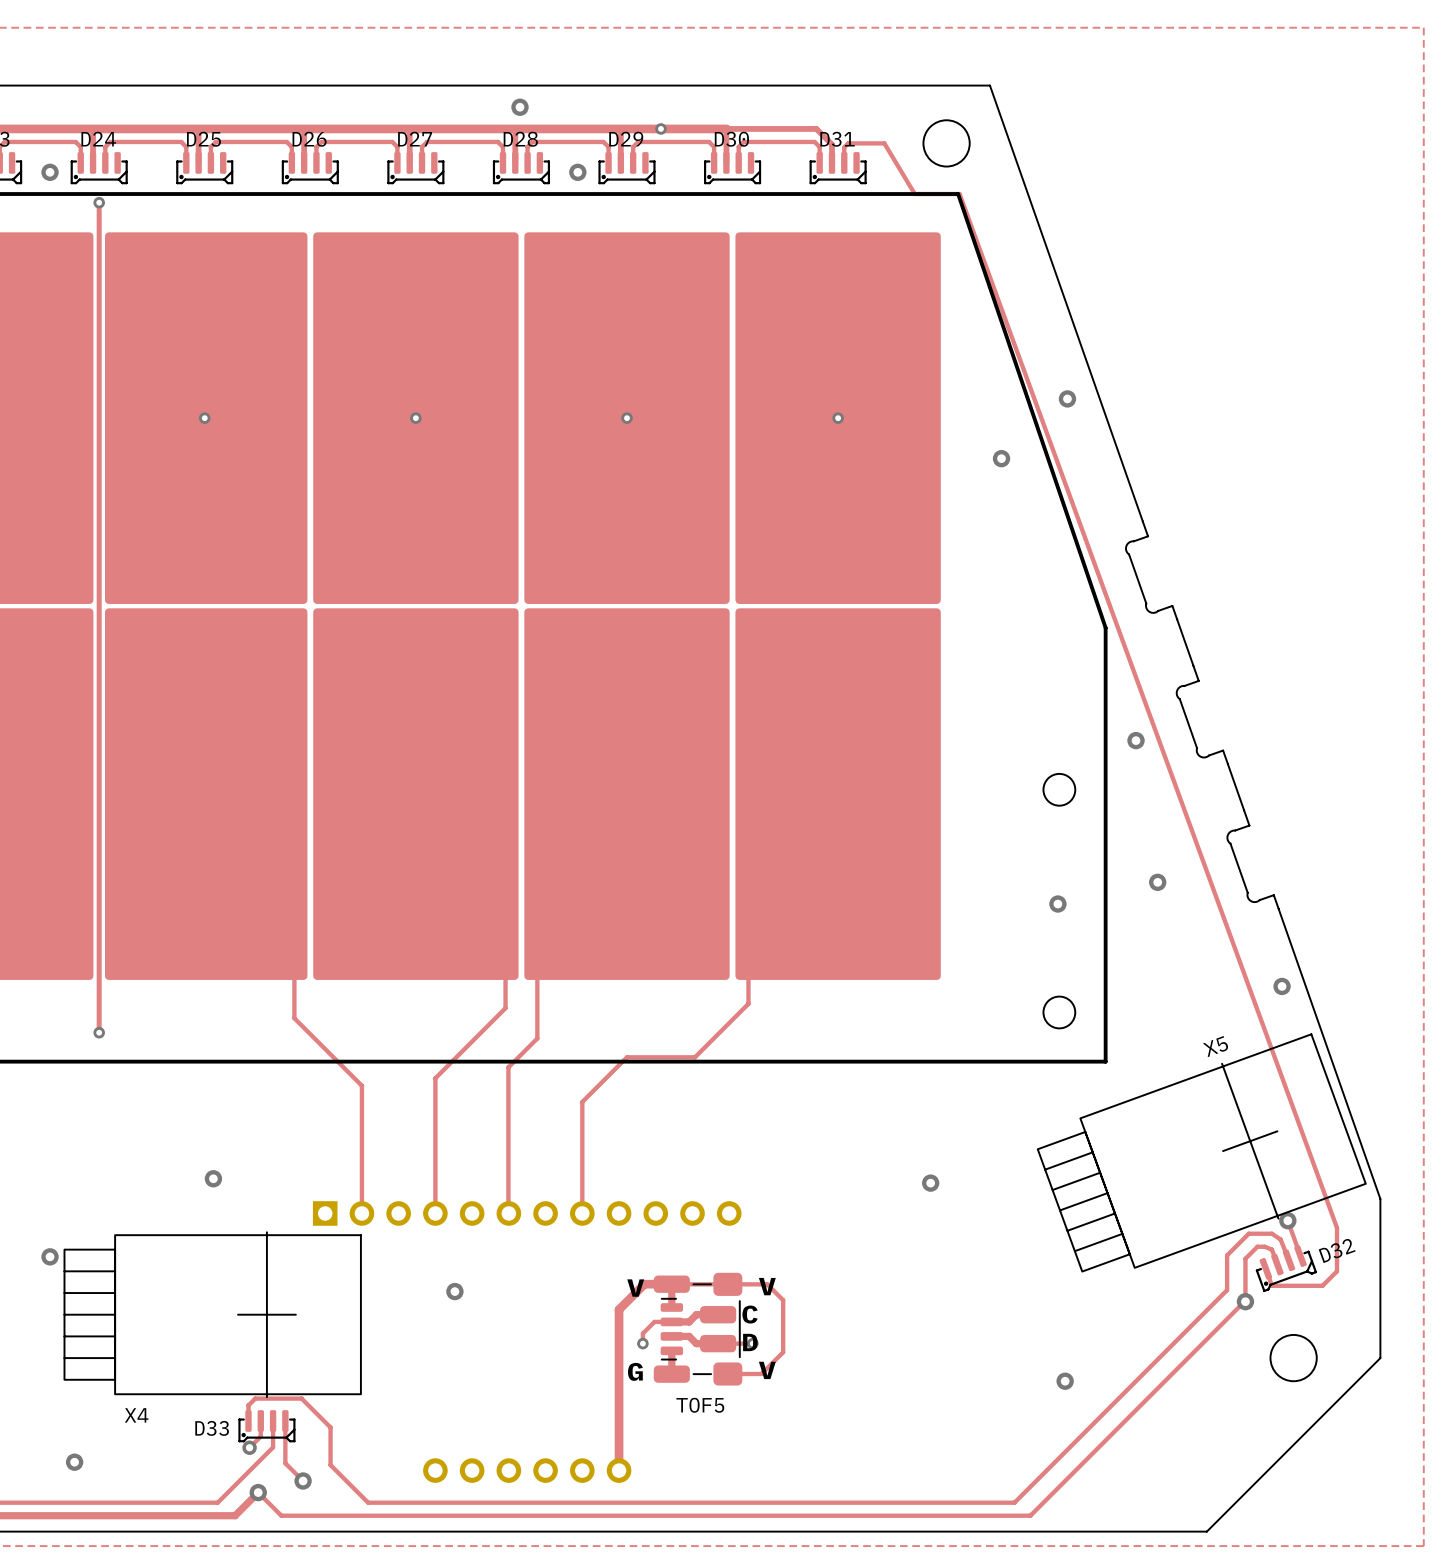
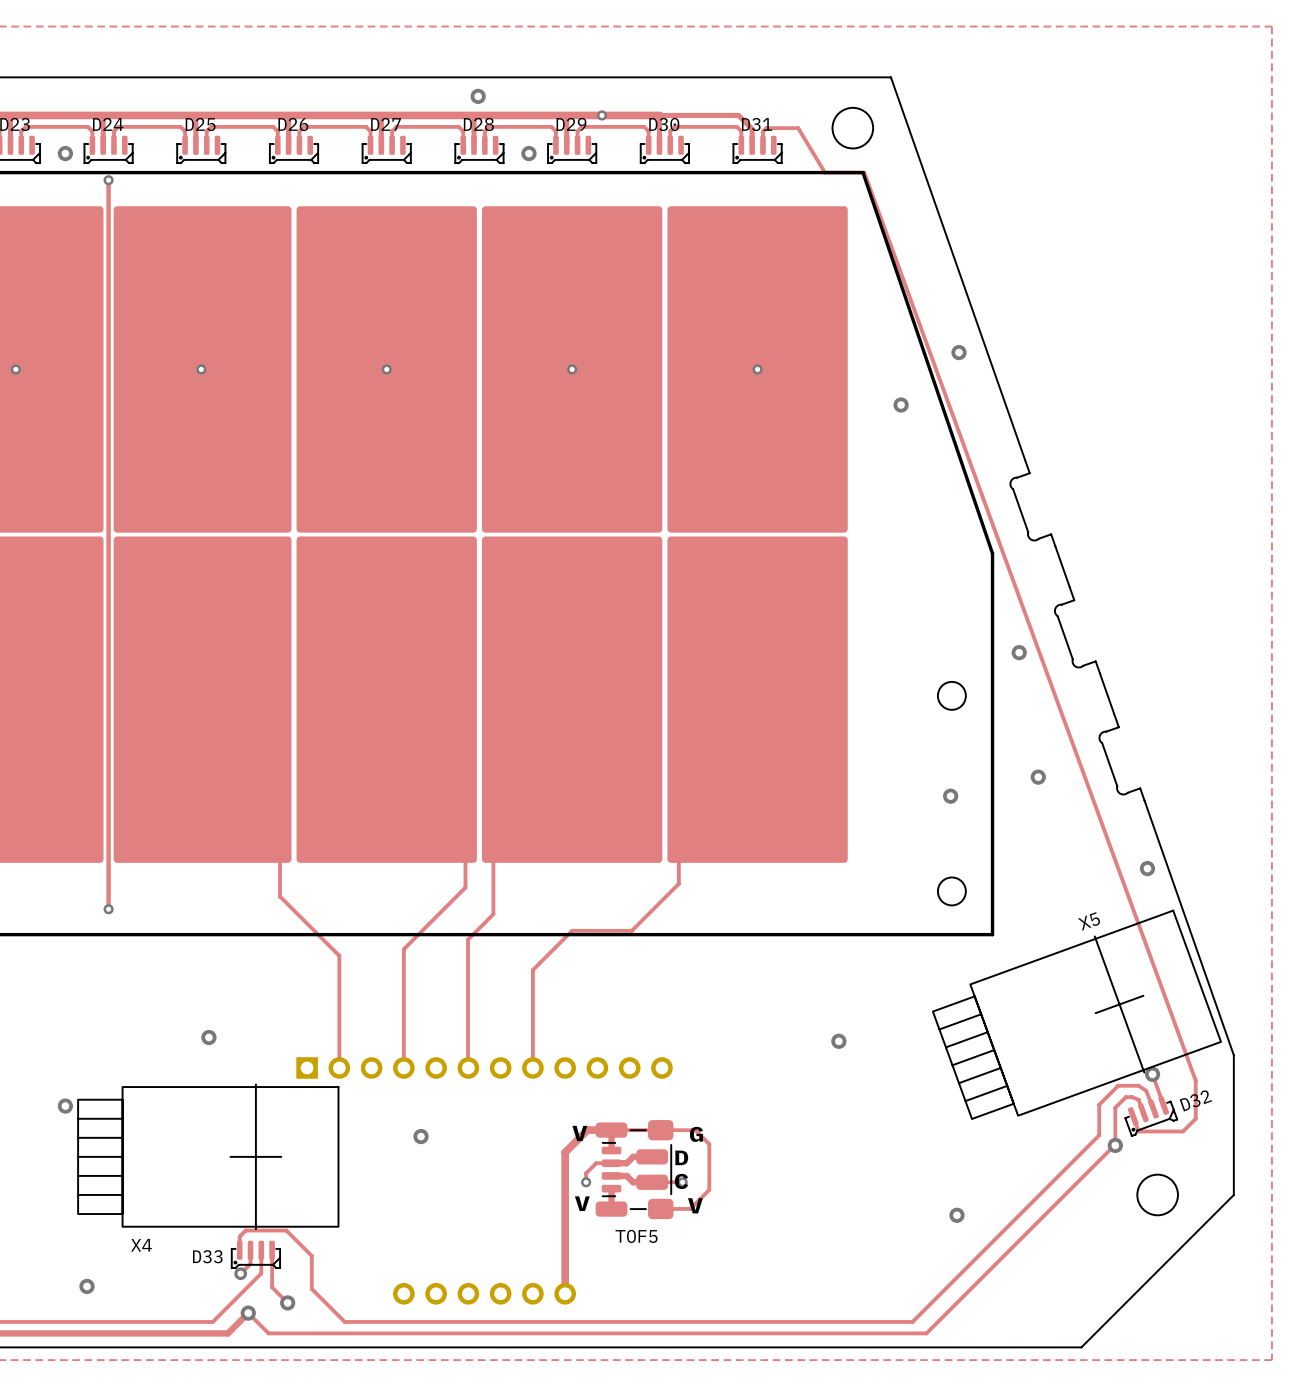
text: V (767, 1286) -> G (696, 1134)
text: C (749, 1314) -> D (681, 1157)
text: D (750, 1342) -> C (681, 1181)
text: G (635, 1371) -> V (582, 1203)

